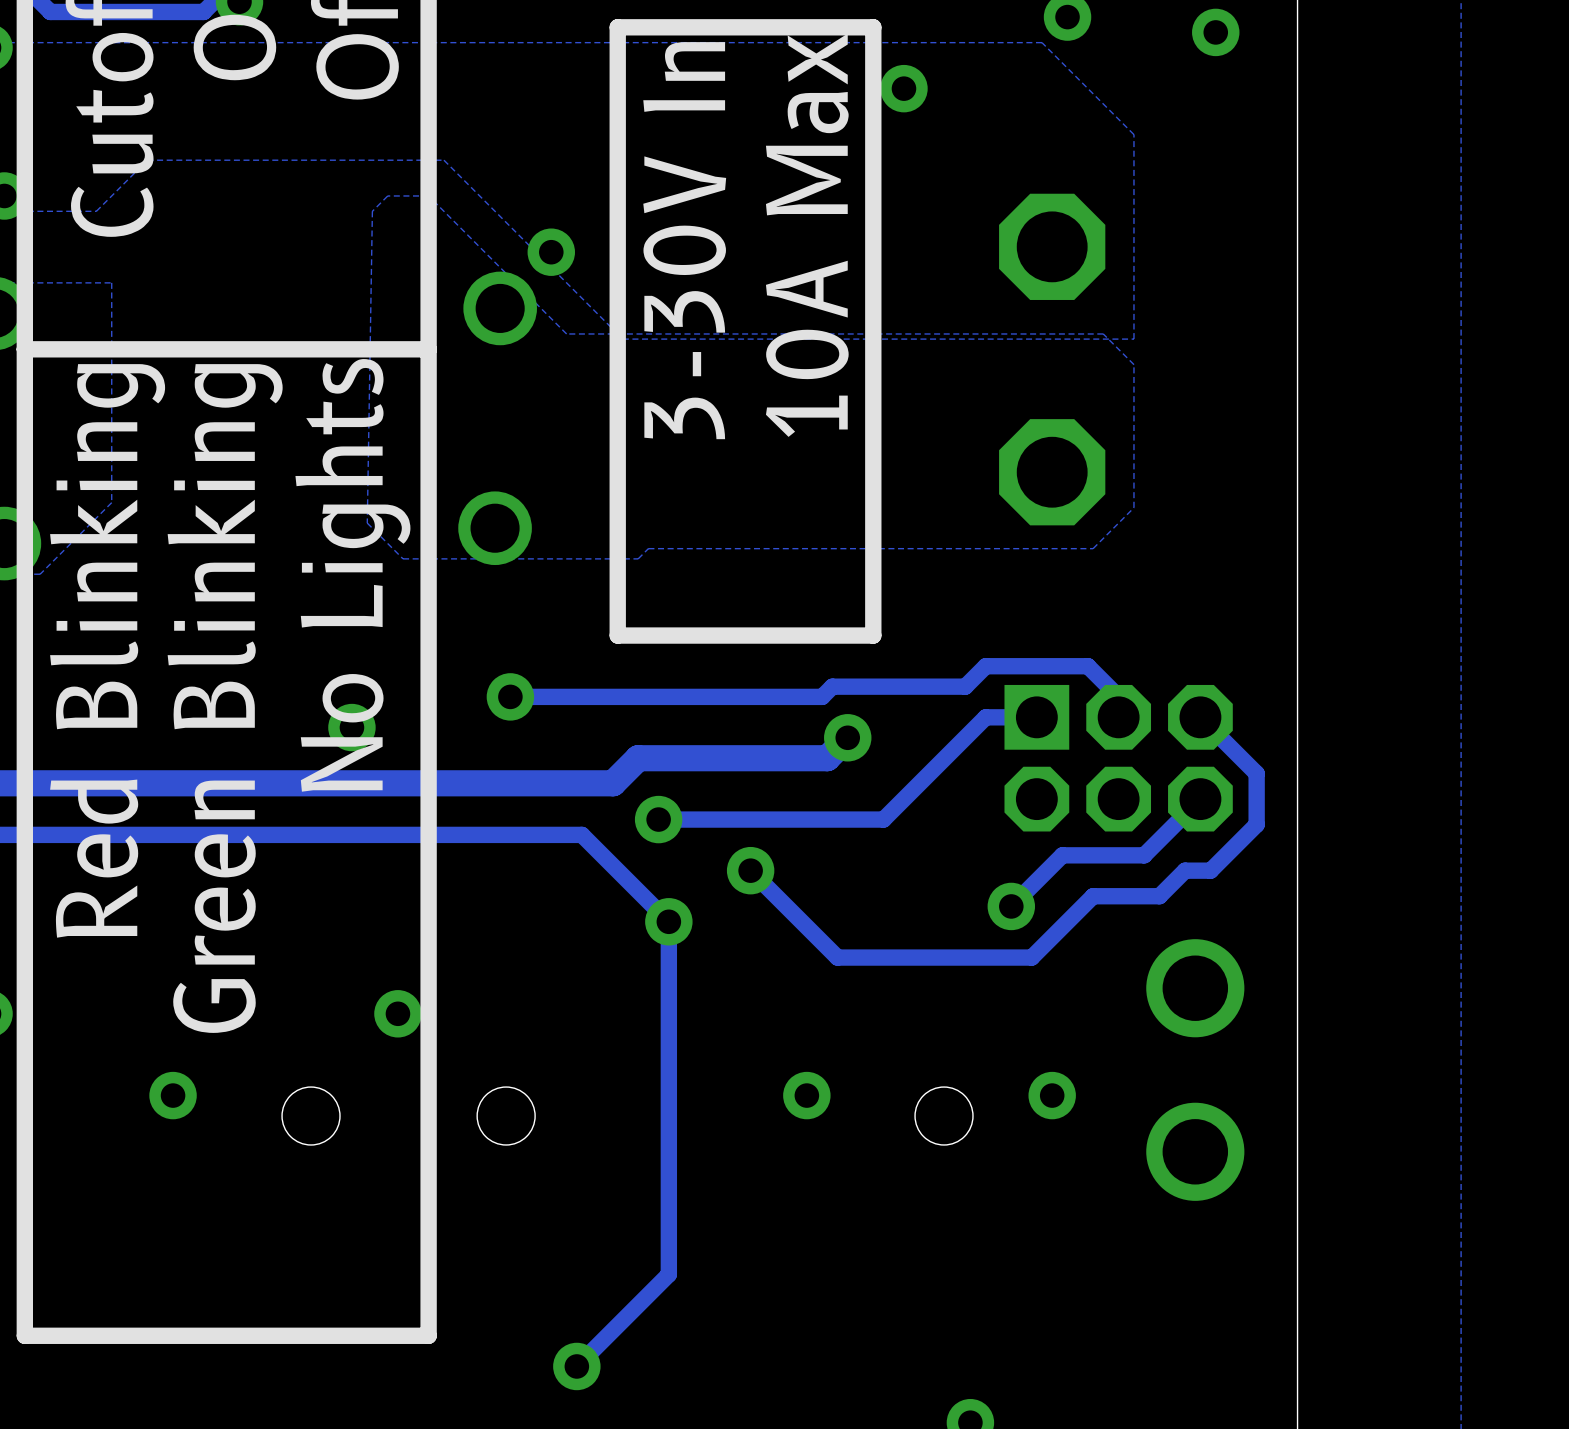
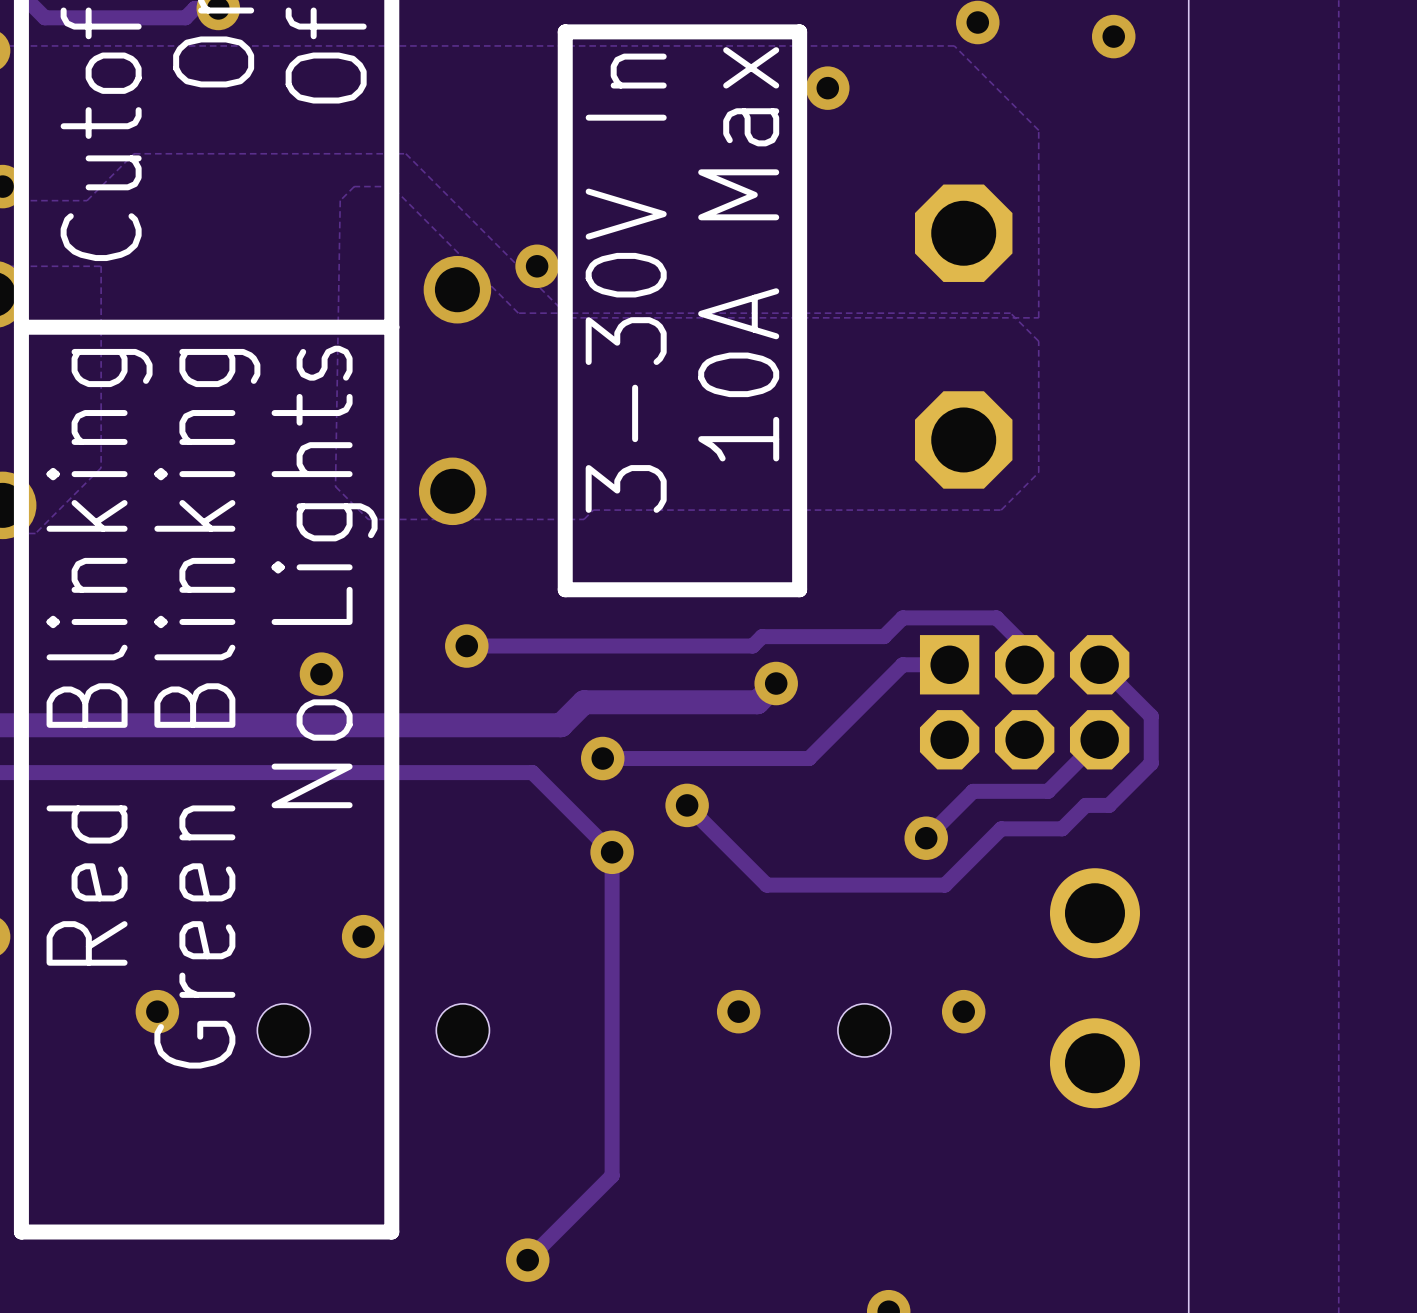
via position: (551, 252) -> (537, 266)

